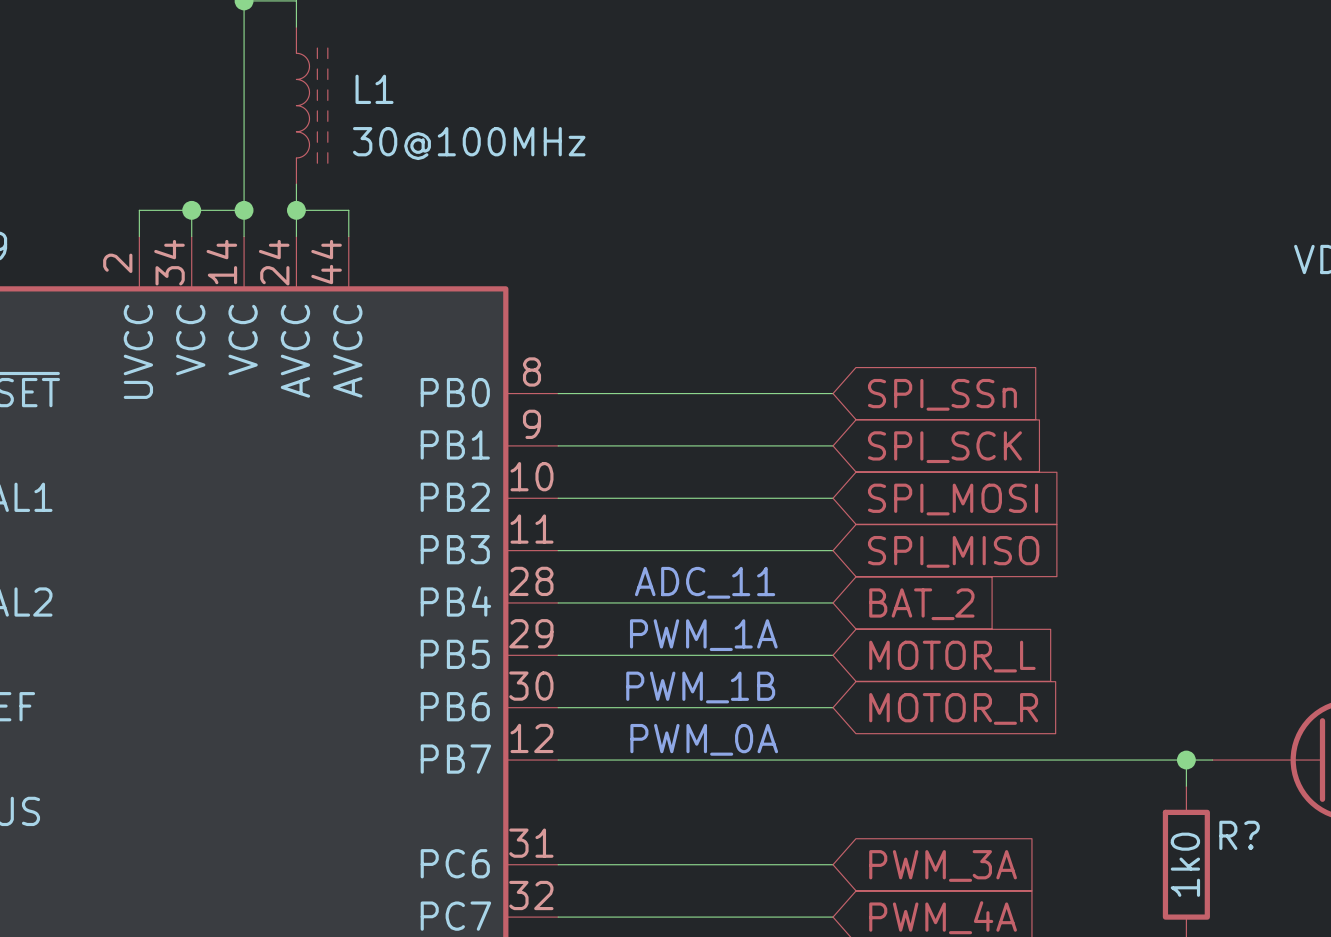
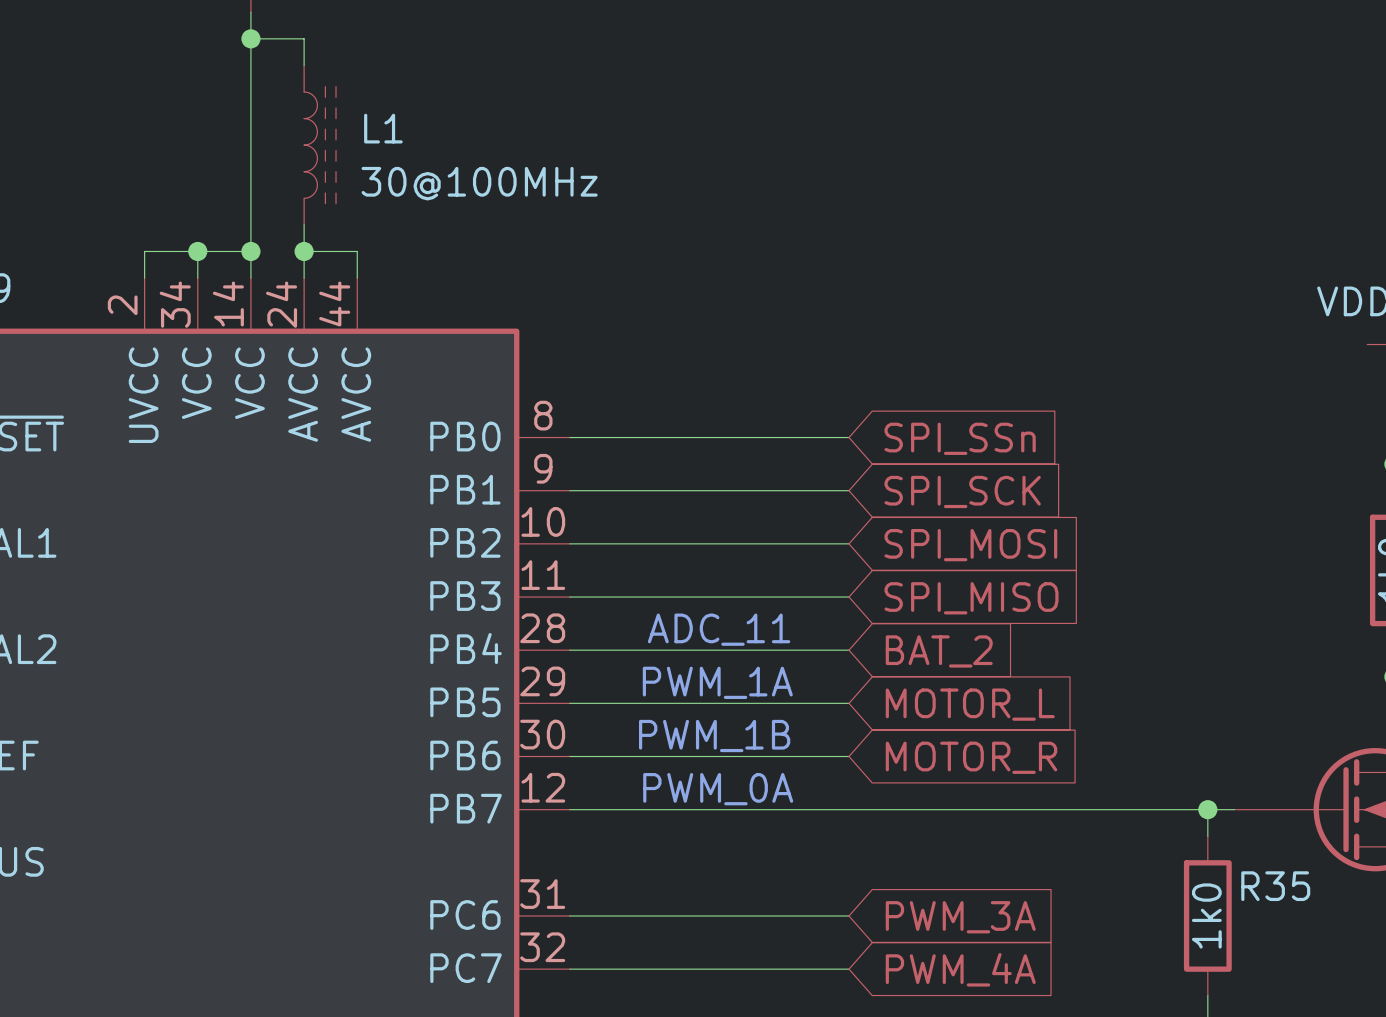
R? name: R? (1239, 835) -> R35 (1275, 886)

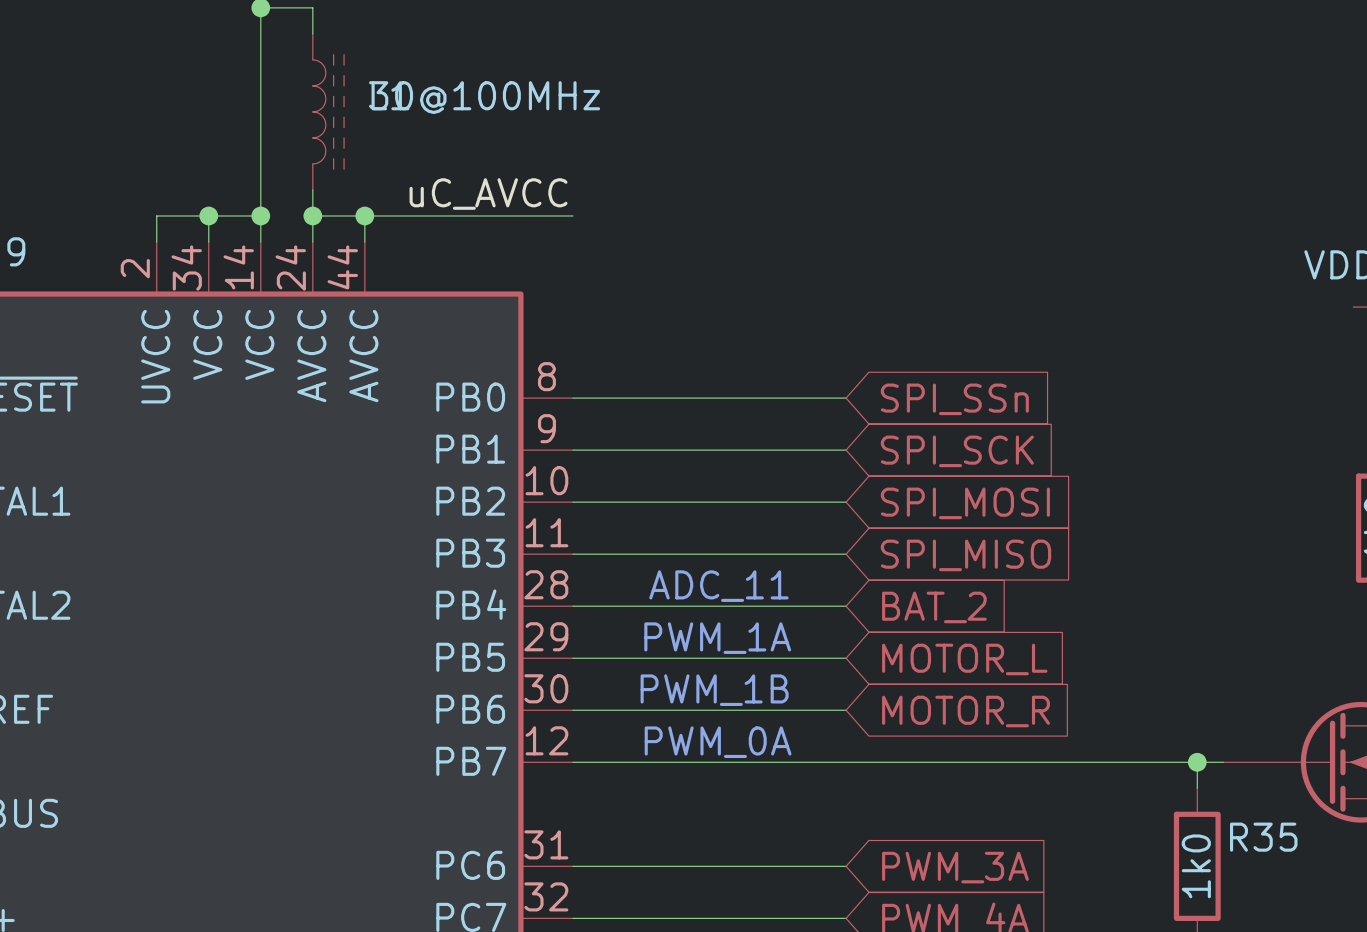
L1 text position: 30@100MHz (479, 183) -> 30@100MHz (484, 97)
label: none -> uC_AVCC (488, 194)
wire: none -> (364, 215) (572, 215)
junction: none -> (364, 215)

